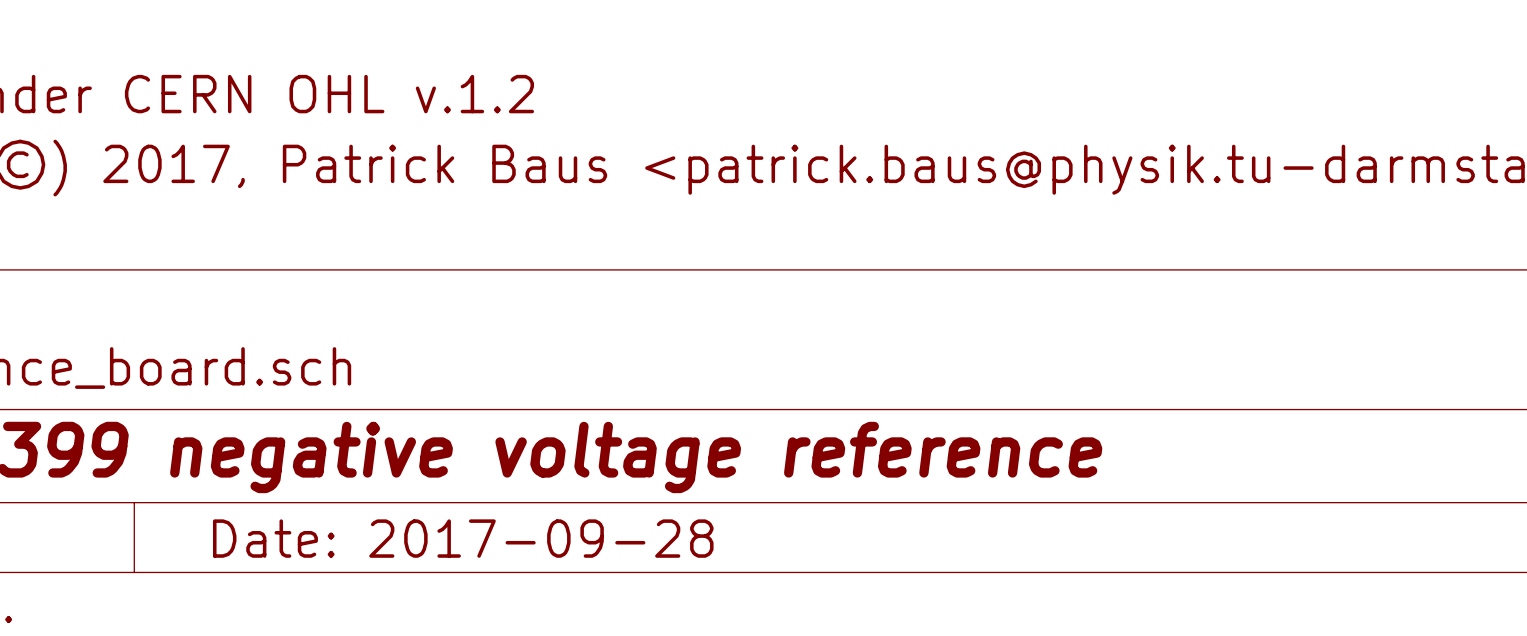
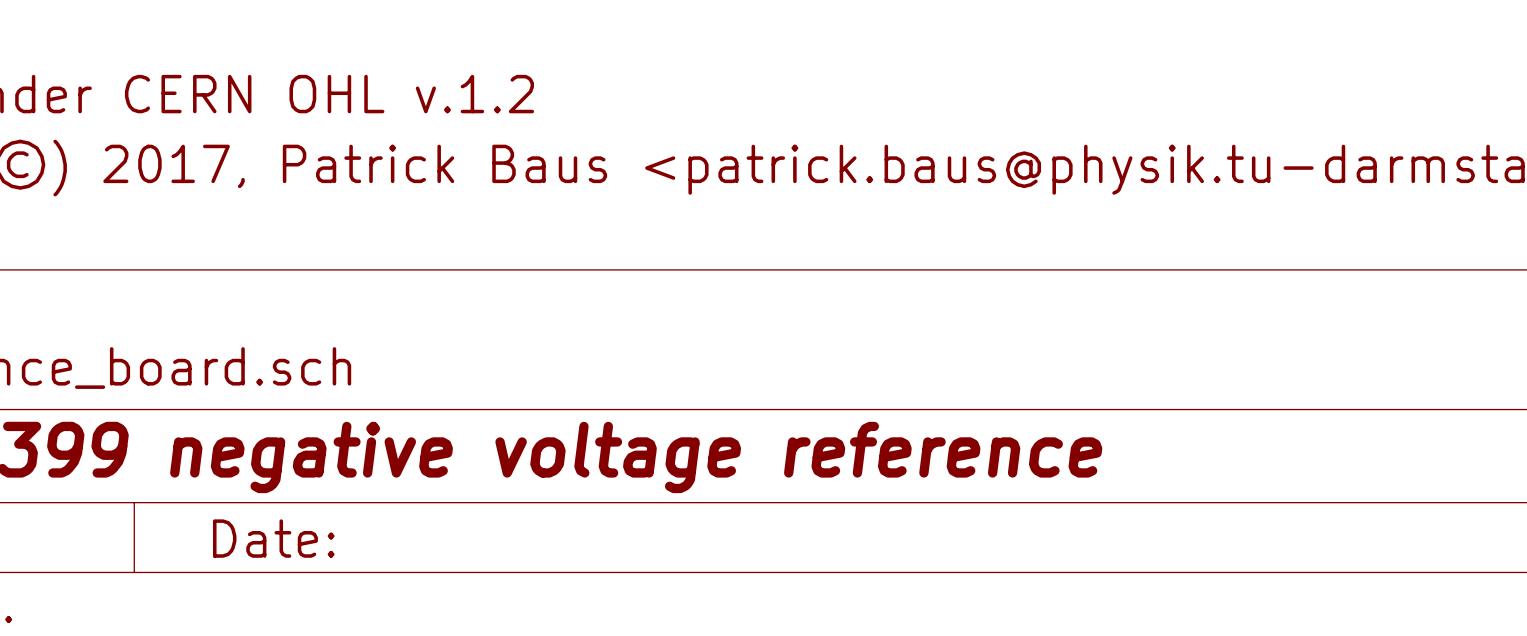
title block: Date: 2017-09-28 (463, 538) -> Date: (273, 538)

